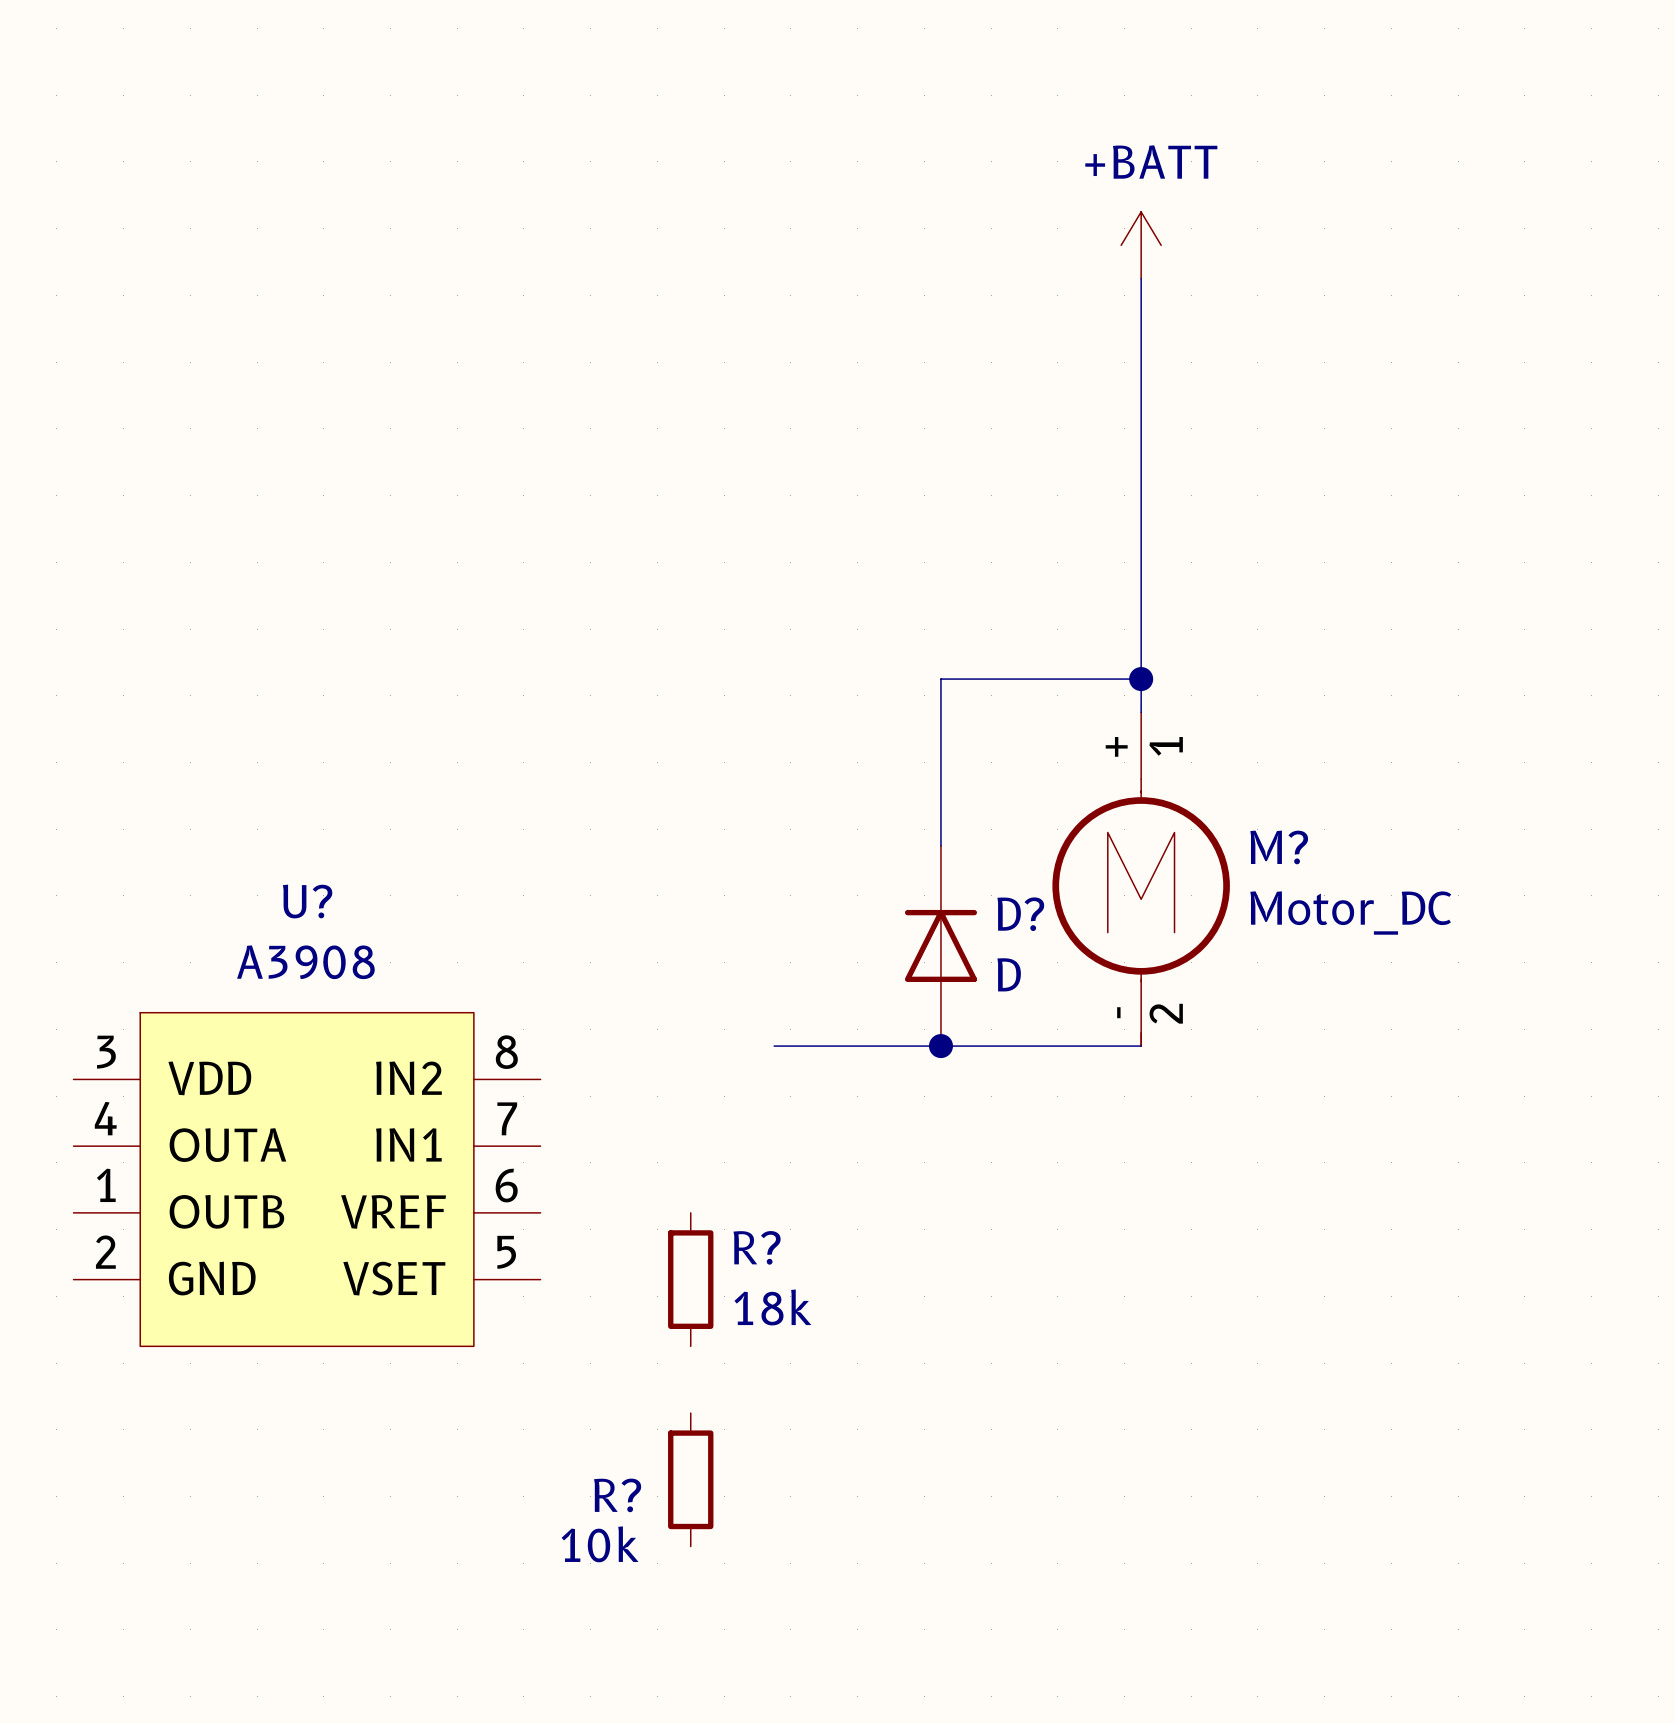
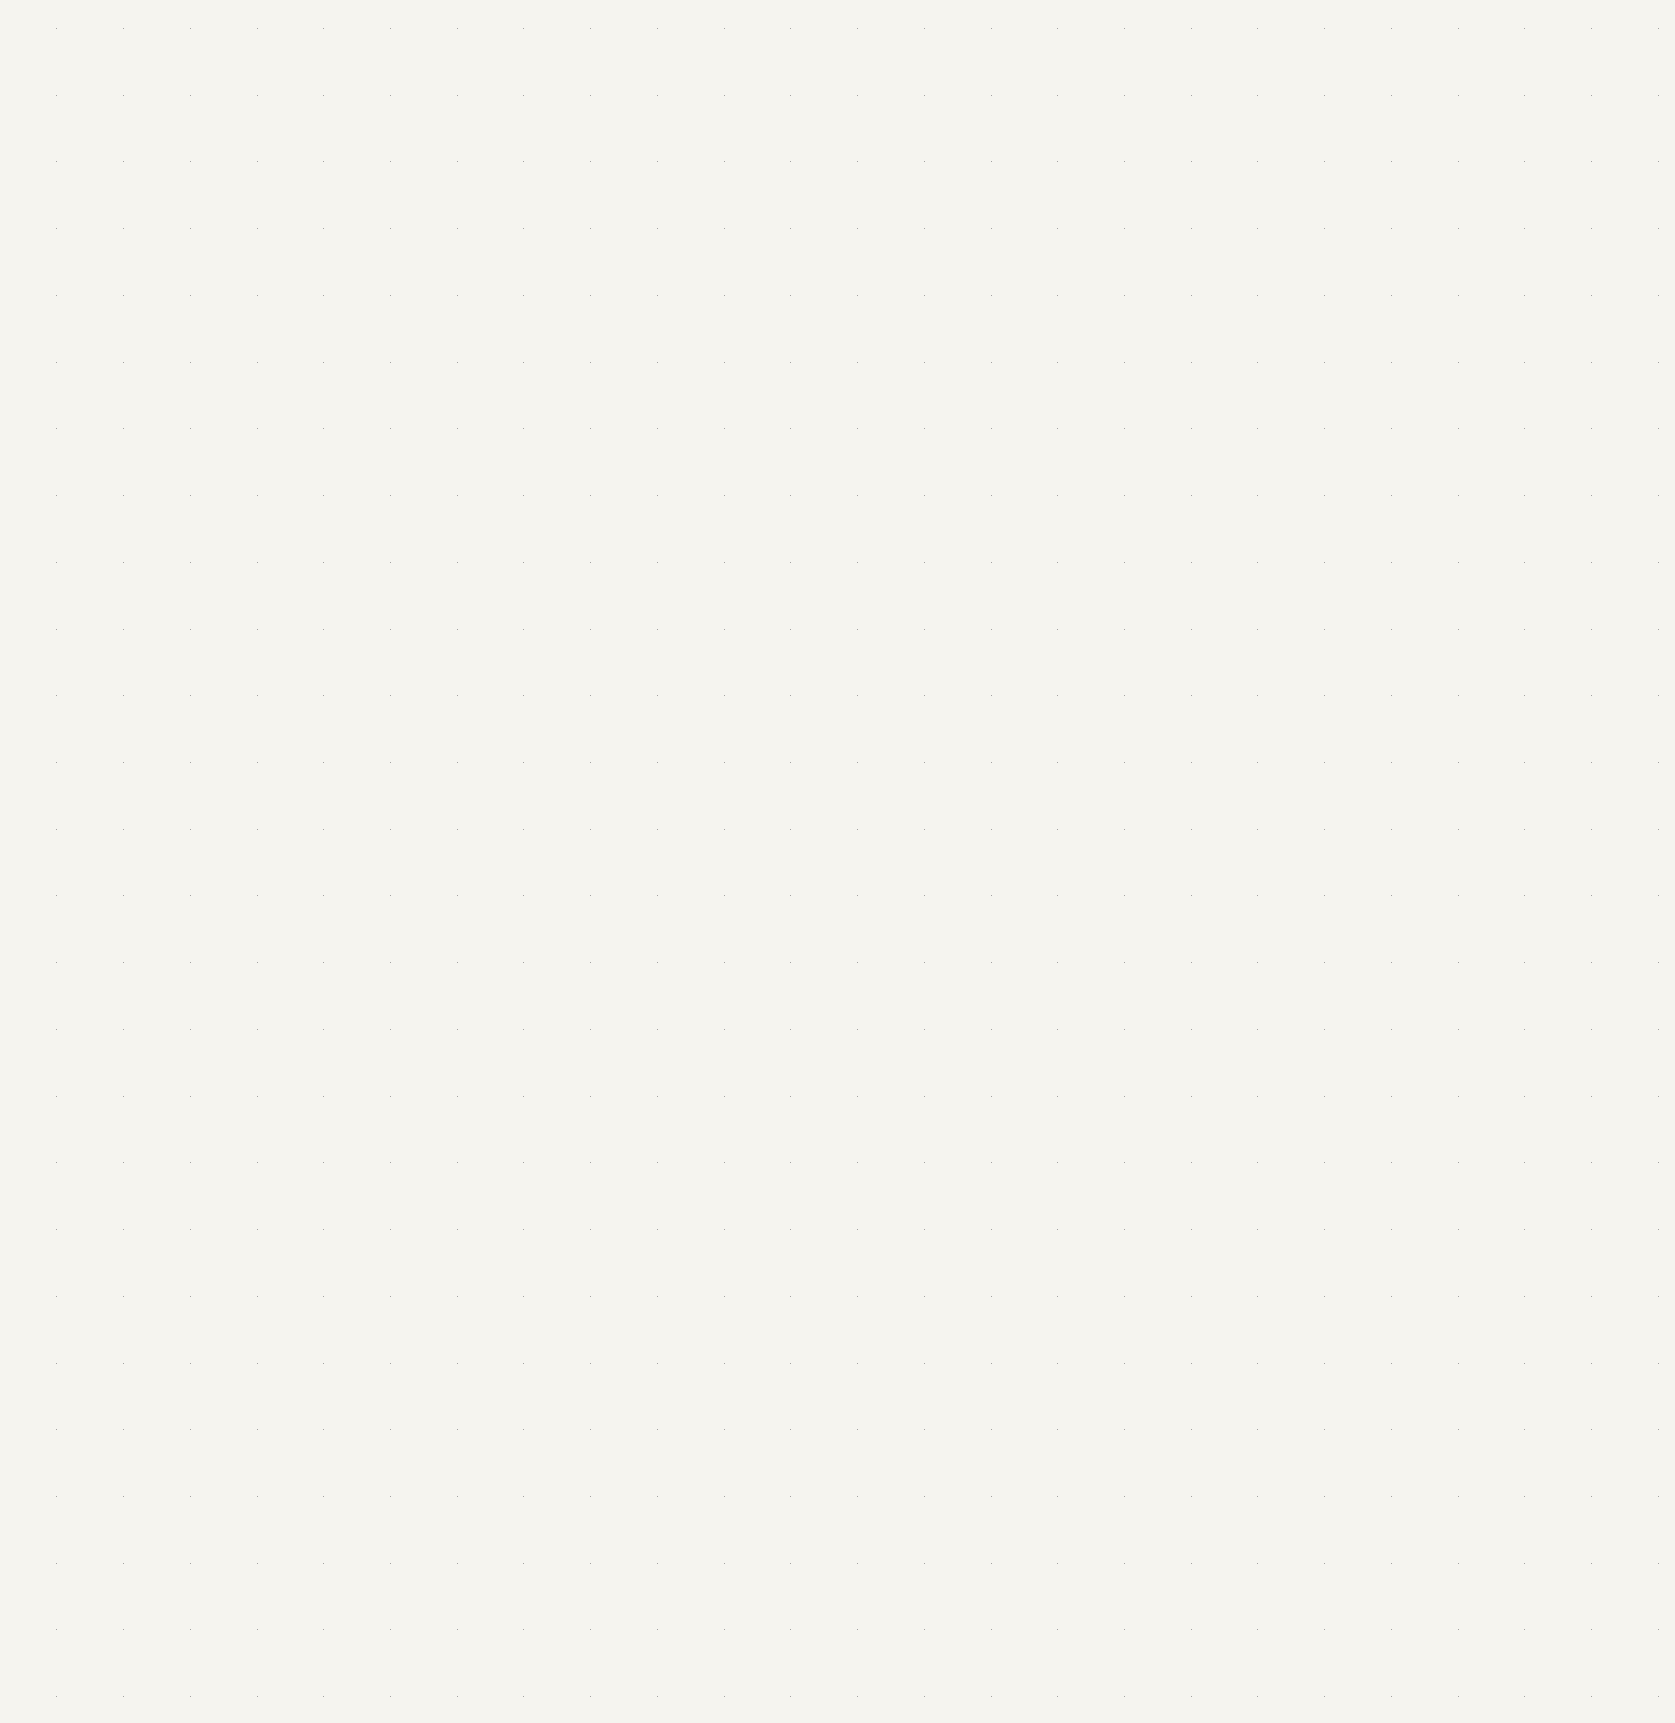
power symbol: +BATT (1141, 245) -> none
wire: (1141, 278) (1141, 712) -> none
wire: (1141, 679) (940, 679) (940, 845) -> none
junction: (1141, 679) -> none
M?: Motor_DC (1141, 879) -> none
D?: D (940, 945) -> none
wire: (774, 1046) (1141, 1046) -> none
junction: (940, 1046) -> none
U?: A3908 (307, 1179) -> none
R?: 18k (690, 1279) -> none
R?: 10k (690, 1479) -> none

